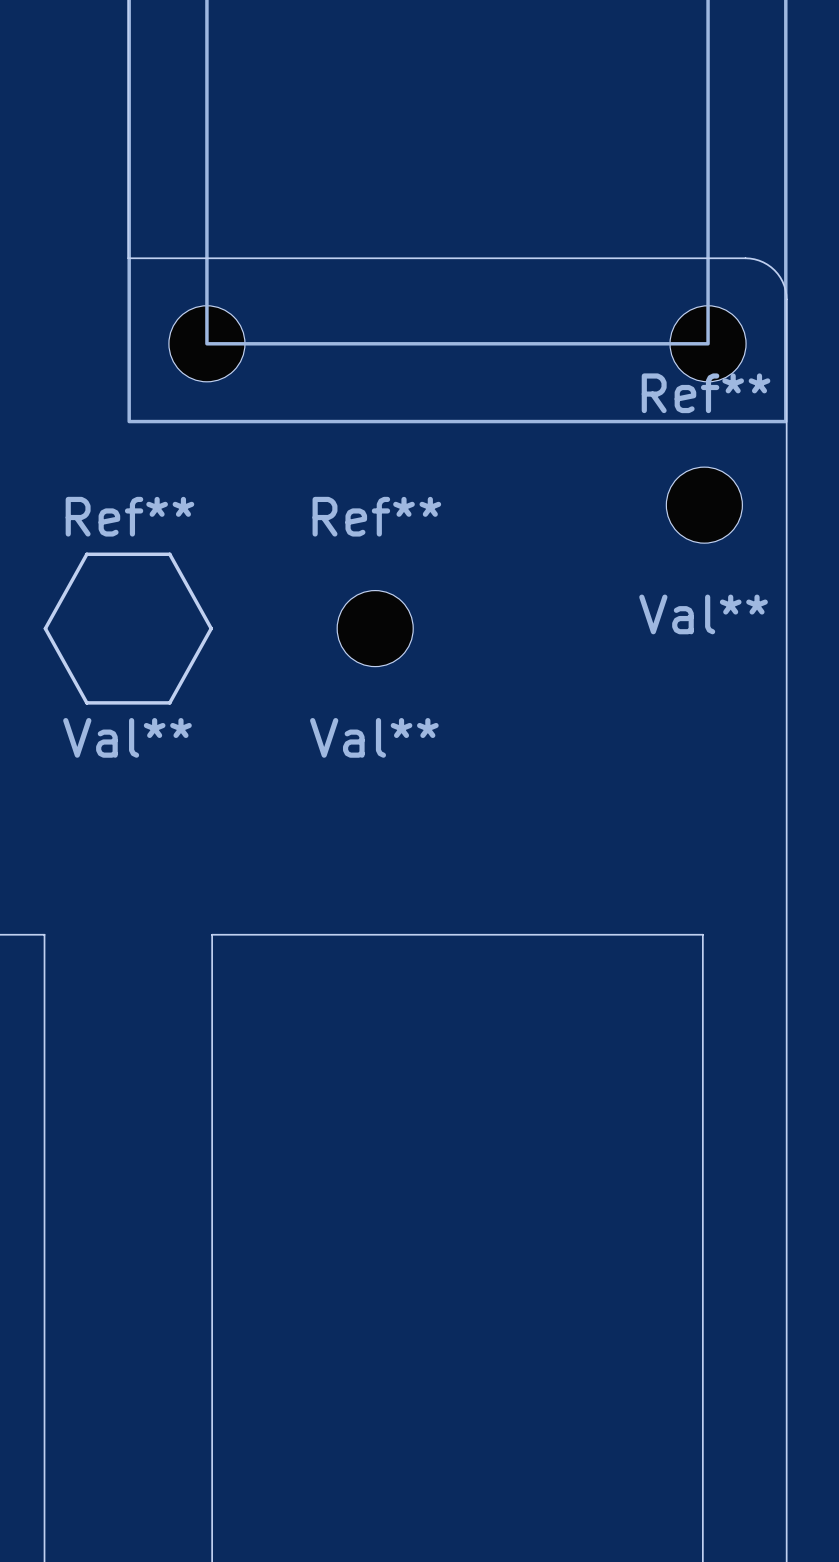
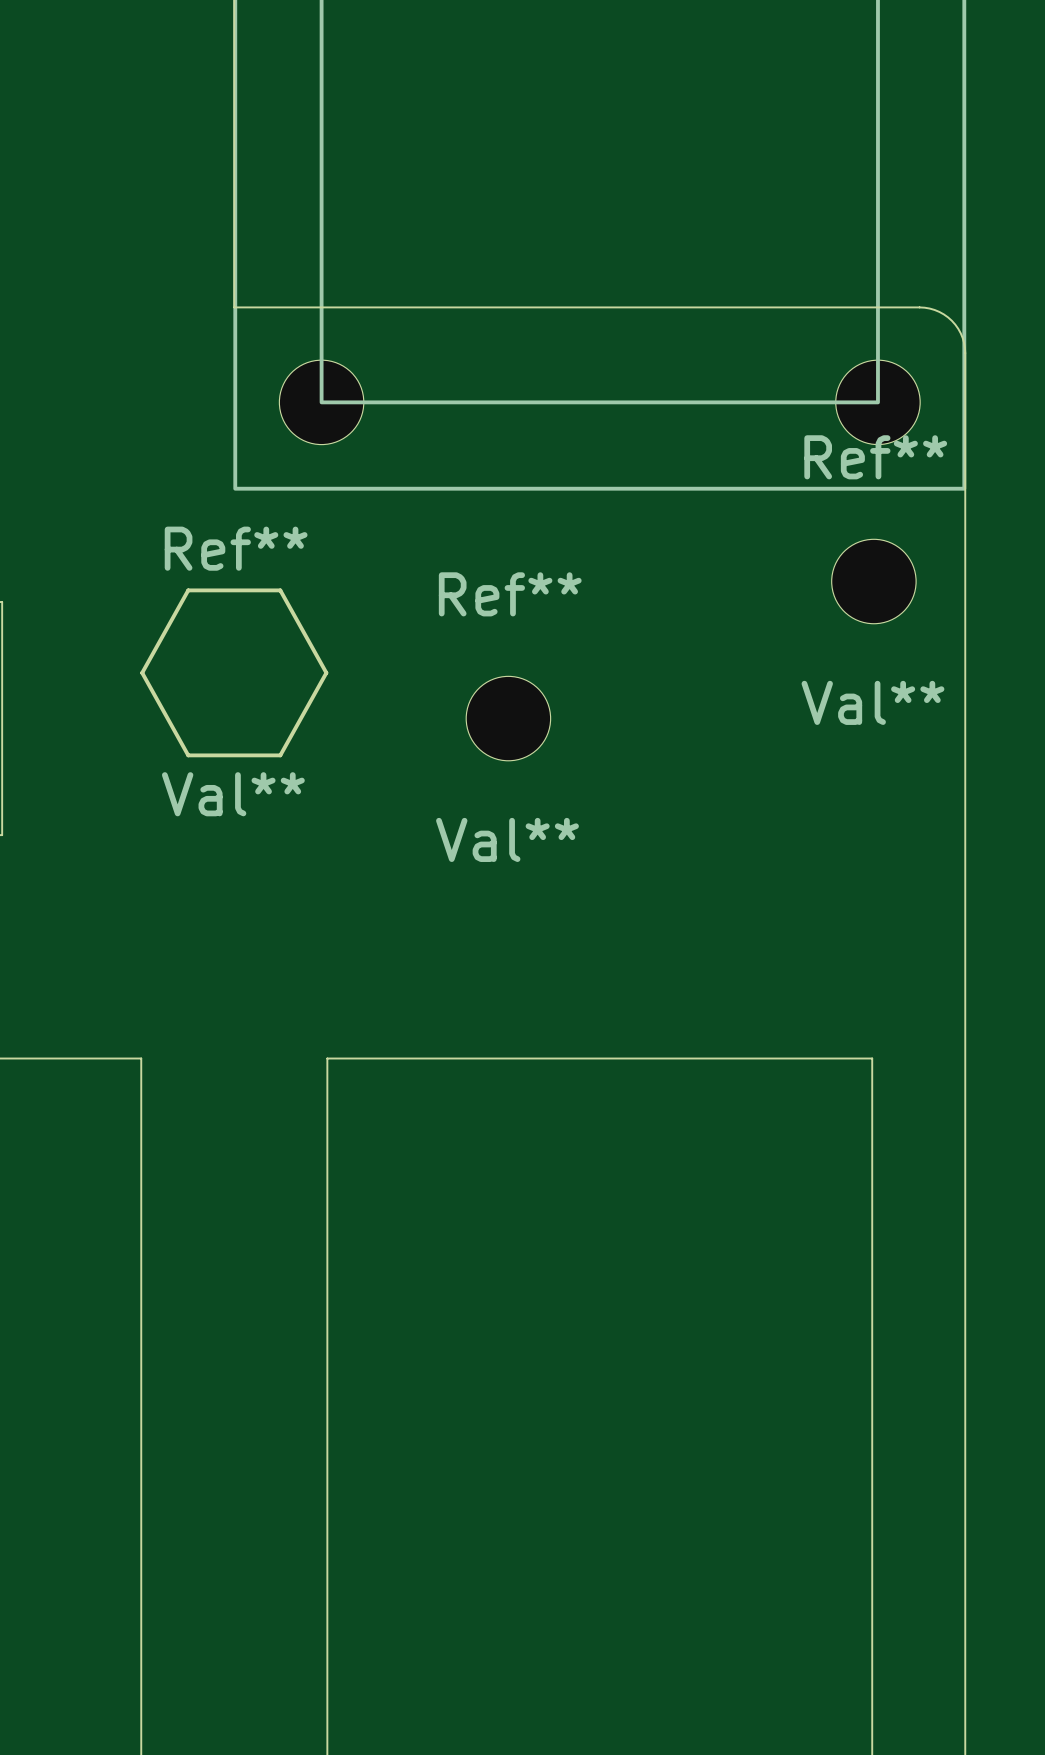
Ref** position: (128, 628) -> (234, 672)

